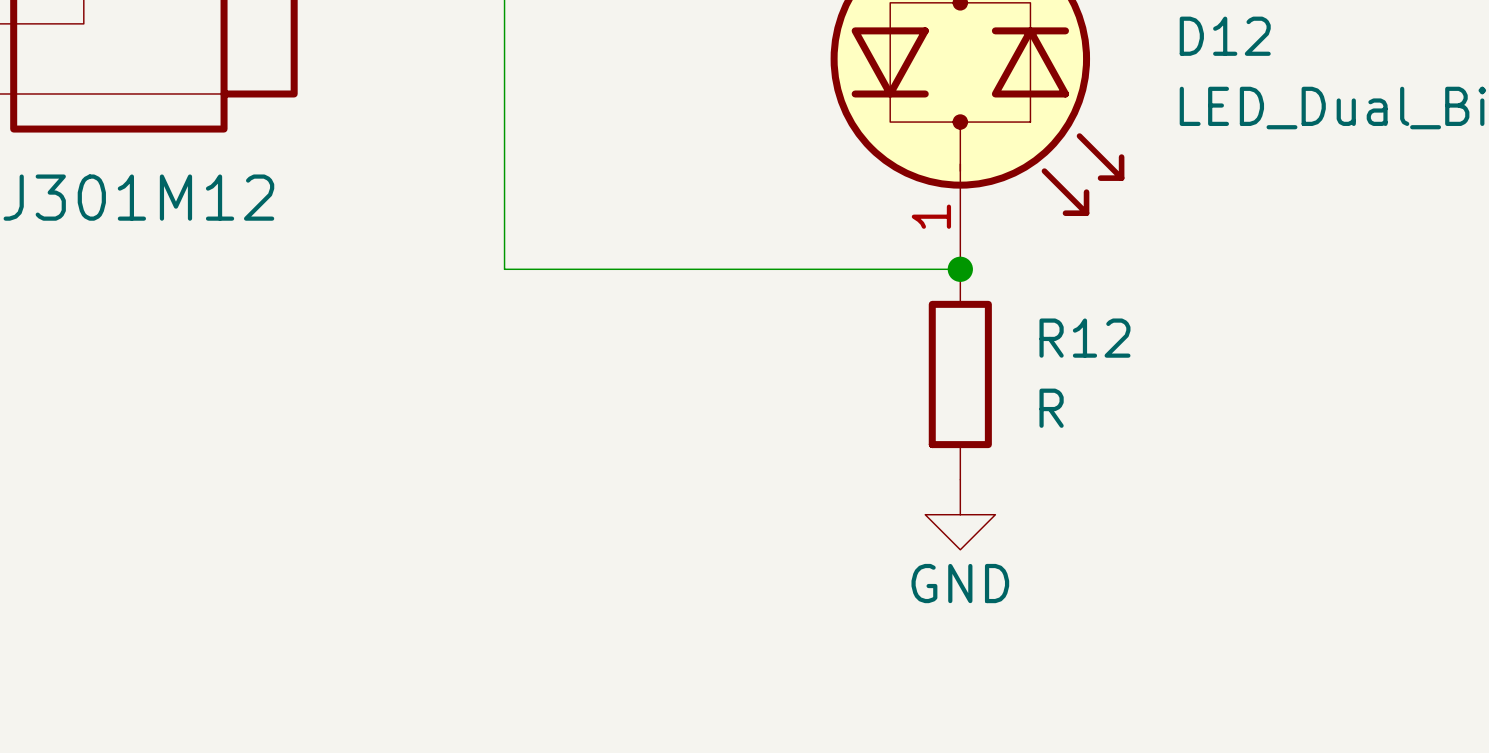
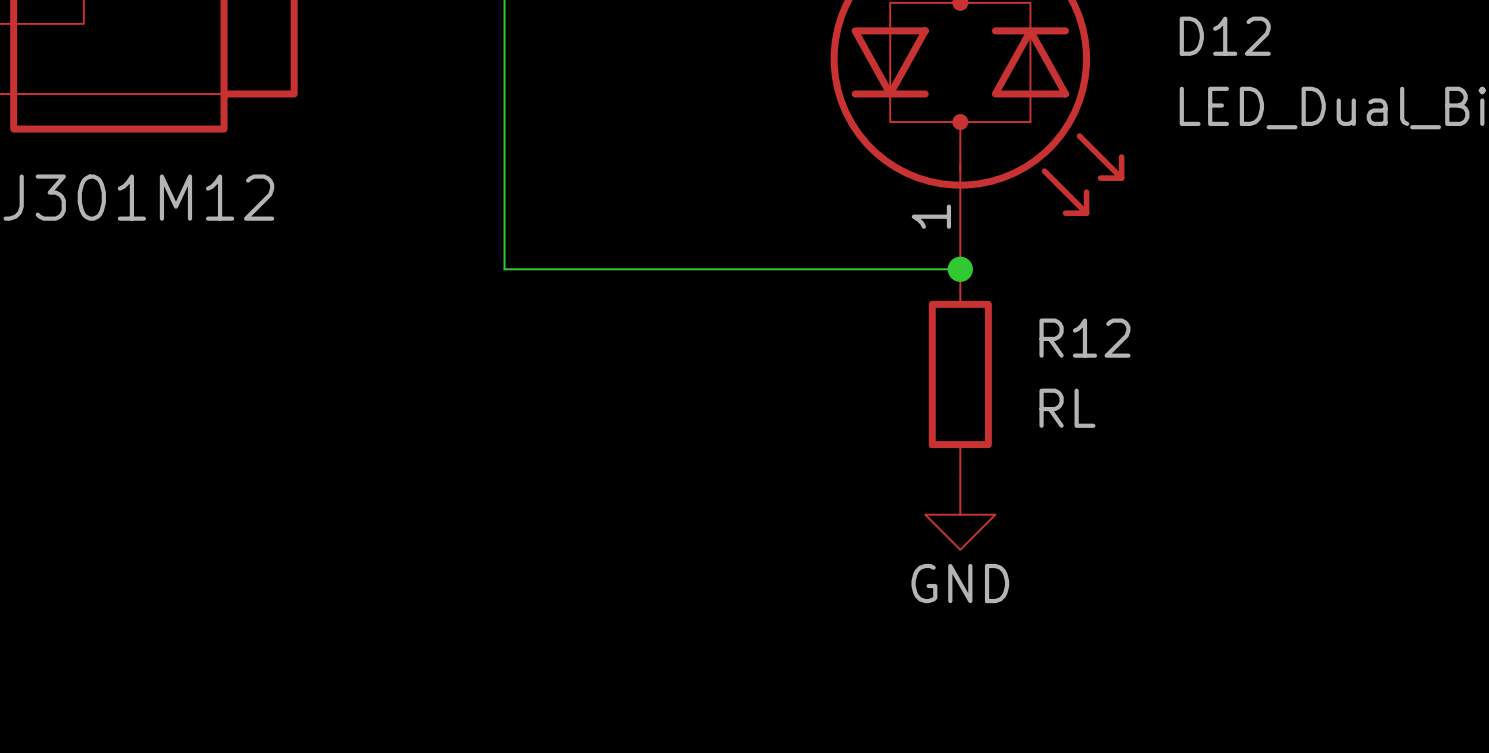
R12 value: R (1051, 408) -> RL (1067, 408)

